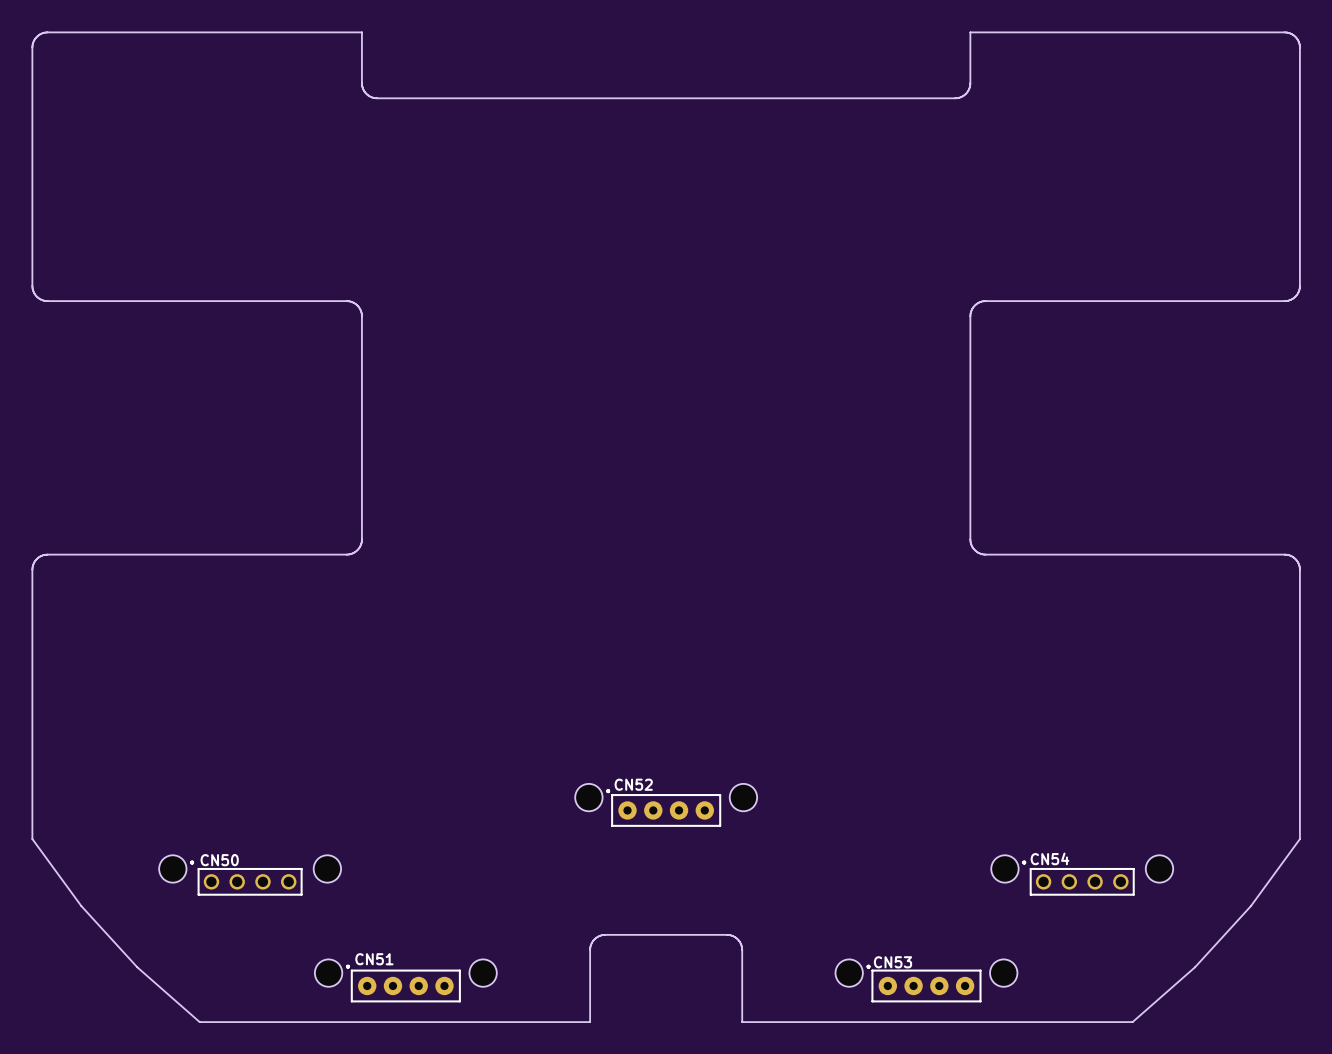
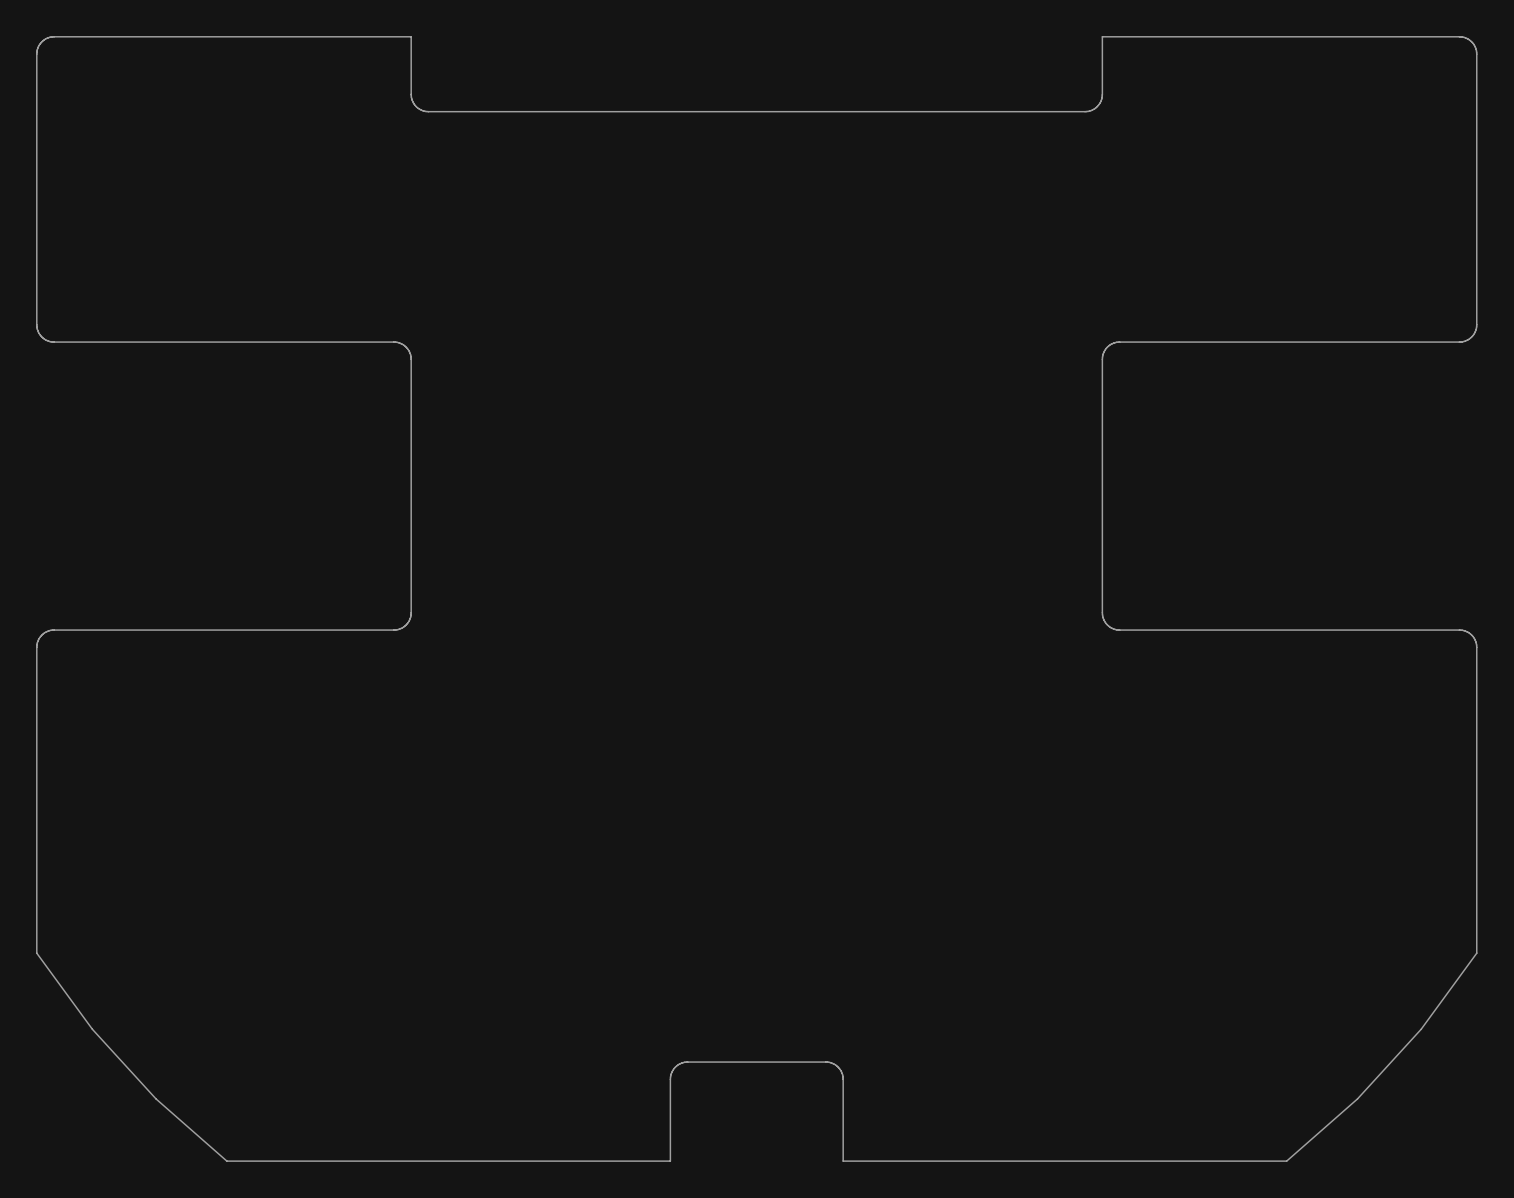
CN52: (666, 805) -> none
CN50: (250, 875) -> none
CN54: (1082, 875) -> none
CN51: (405, 980) -> none
CN53: (926, 980) -> none

